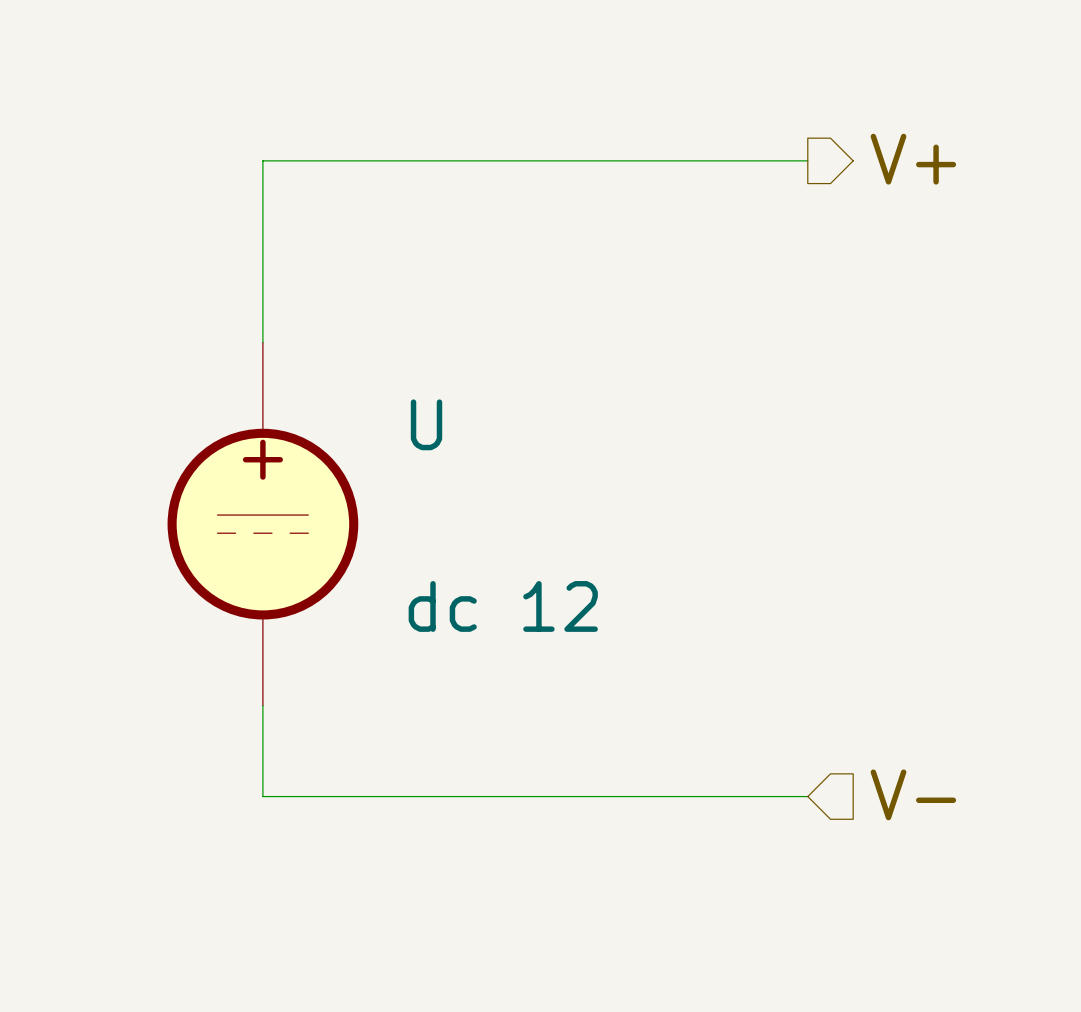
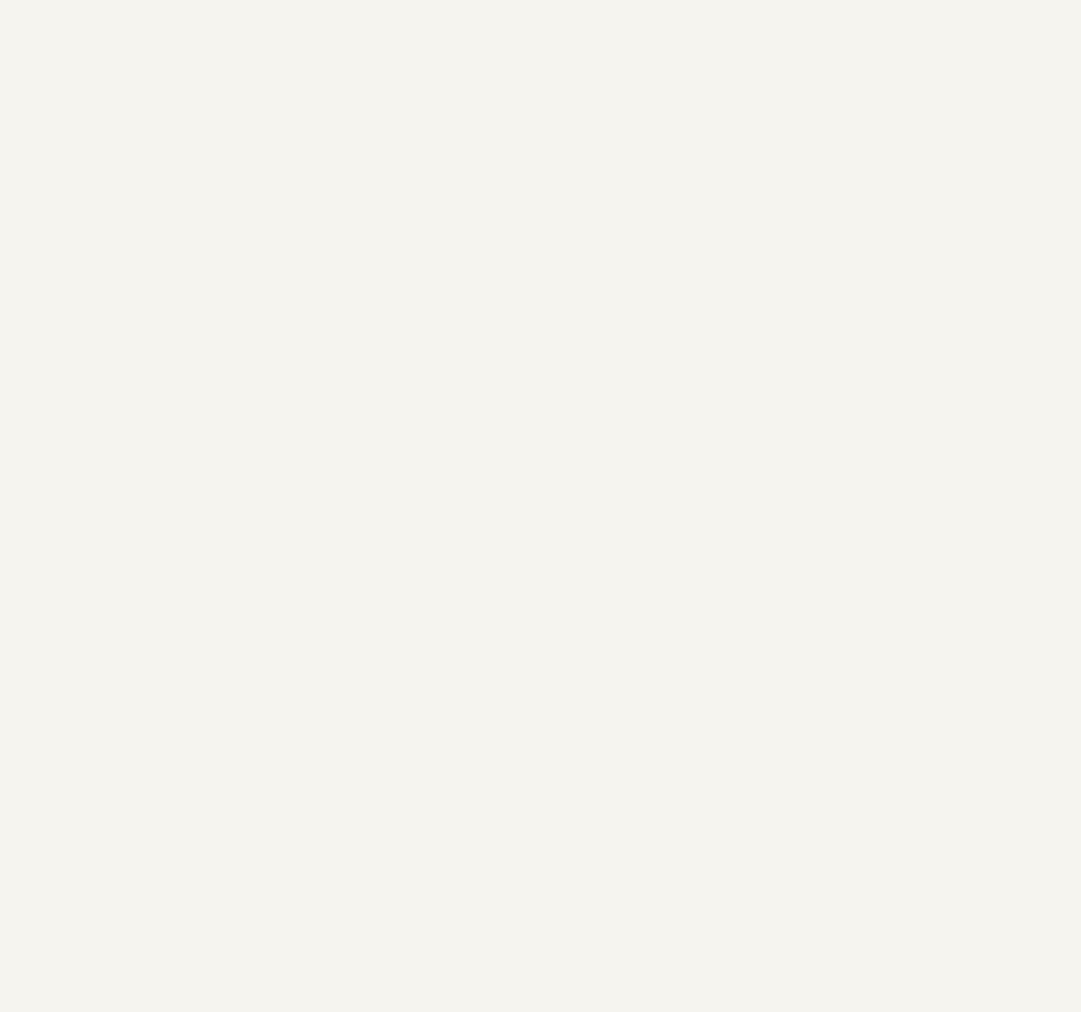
hierarchical label: V+ (913, 159) -> none
wire: (807, 160) (262, 160) (262, 342) -> none
U: (262, 524) -> none
wire: (262, 705) (262, 796) (807, 796) -> none
hierarchical label: V- (913, 794) -> none

